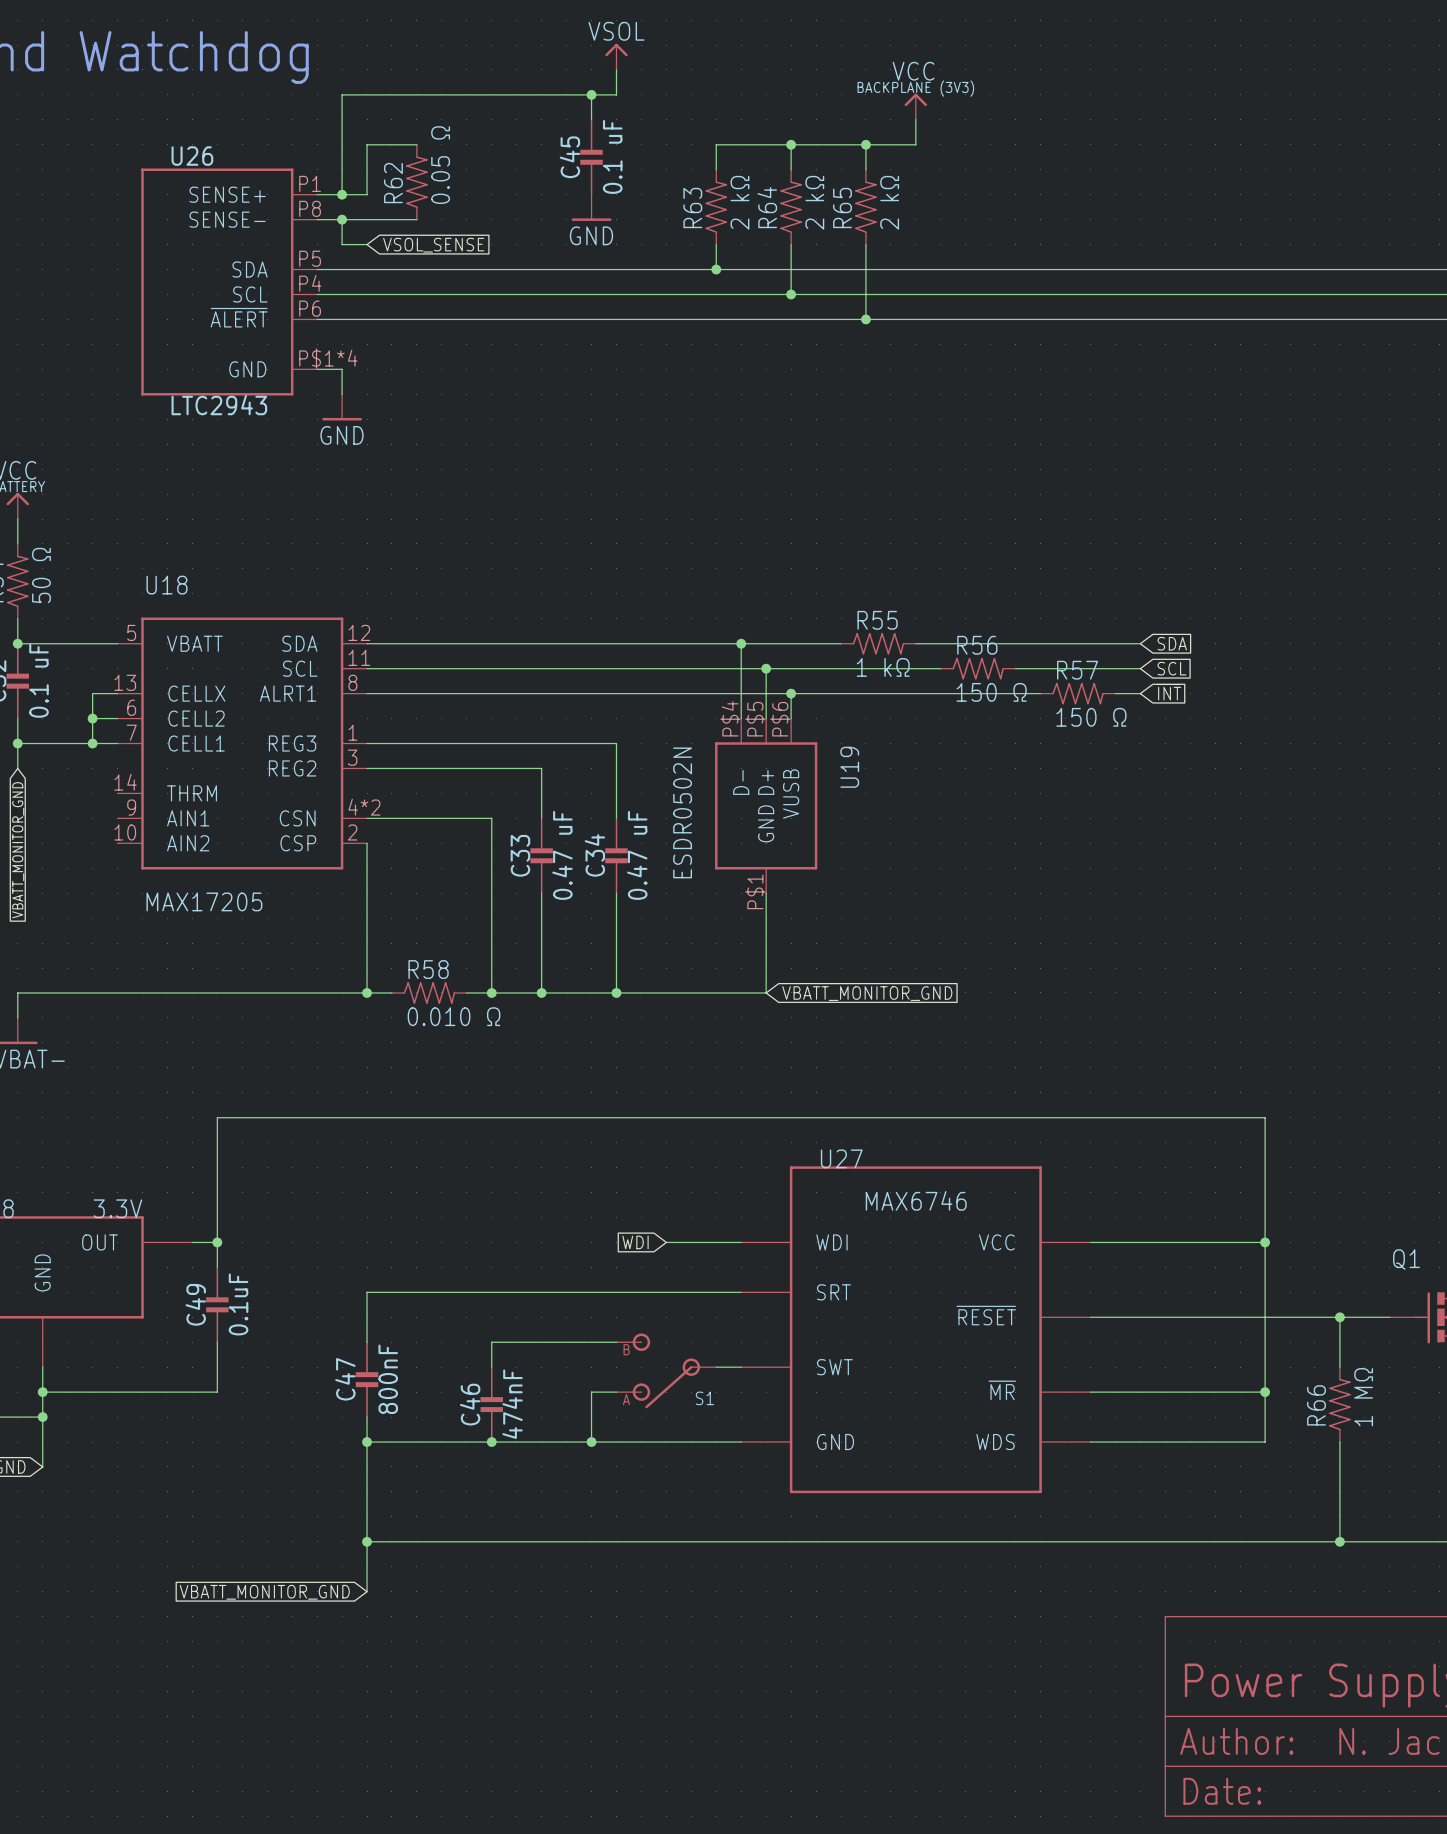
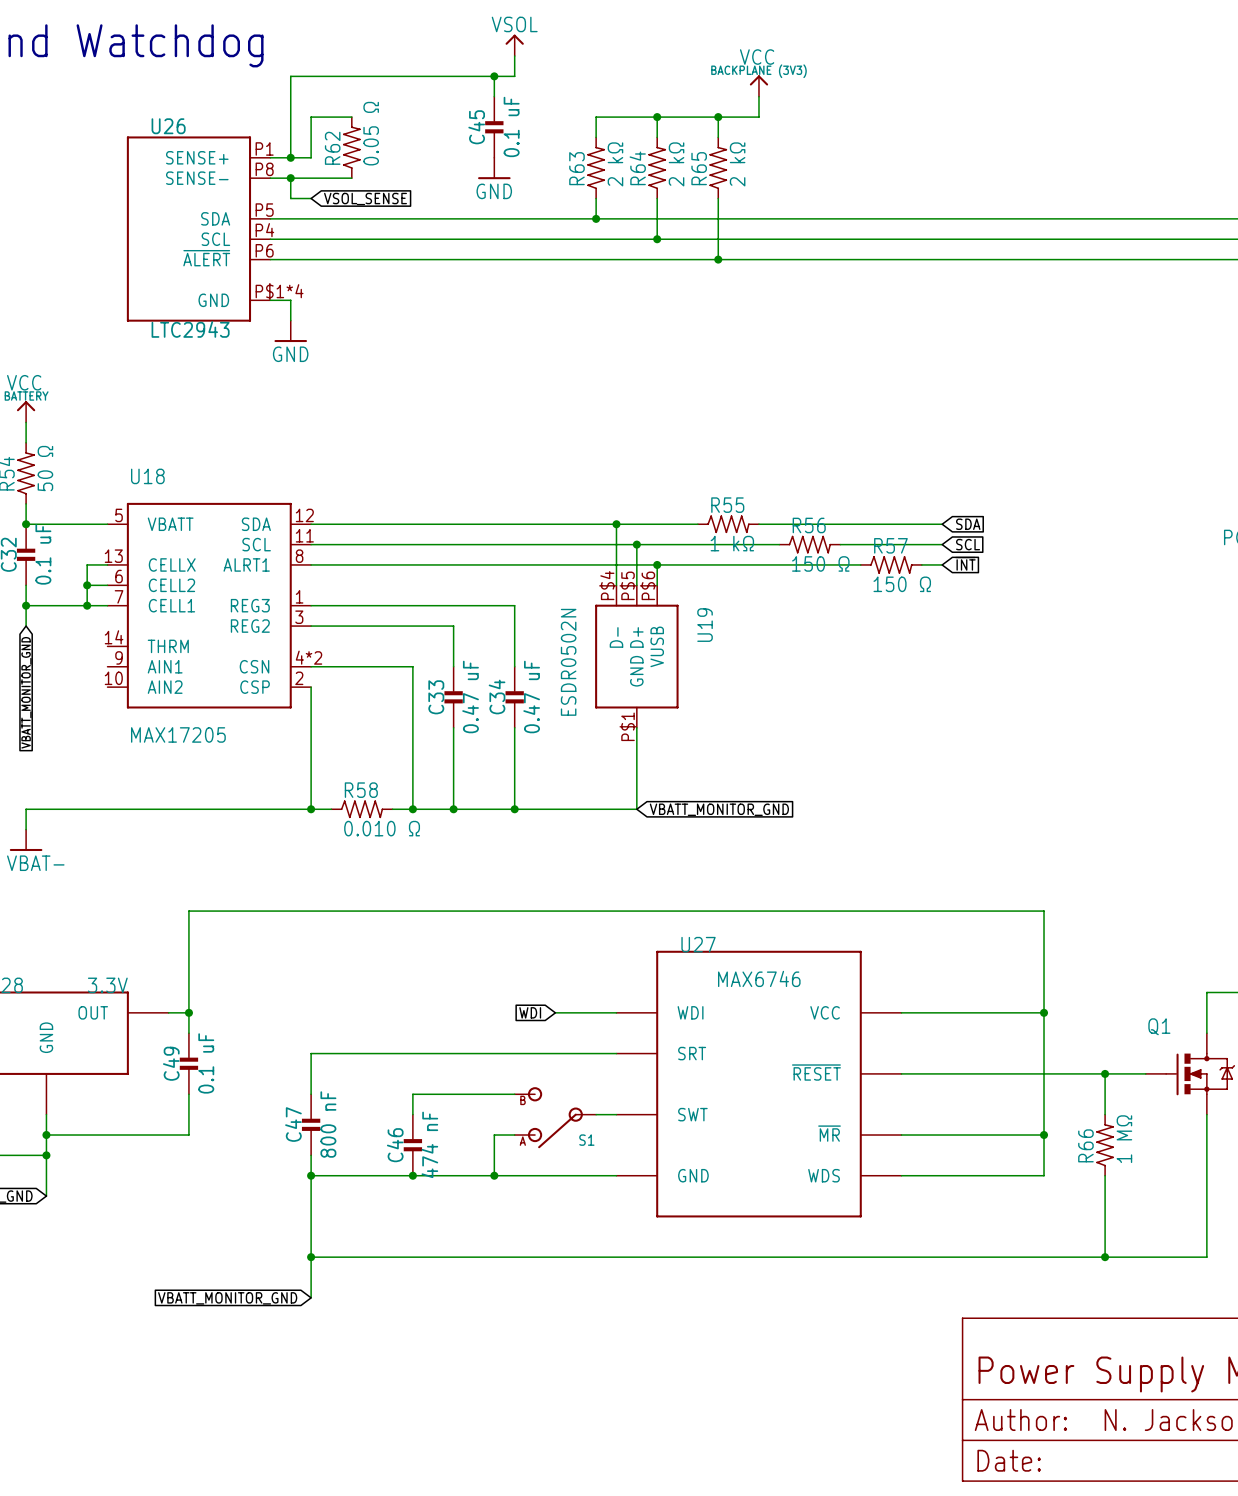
C49 value: 0.1uF (238, 1304) -> 0.1 uF (206, 1063)
C47 value: 800nF (388, 1379) -> 800 nF (328, 1124)
C46 value: 474nF (512, 1404) -> 474 nF (429, 1144)

